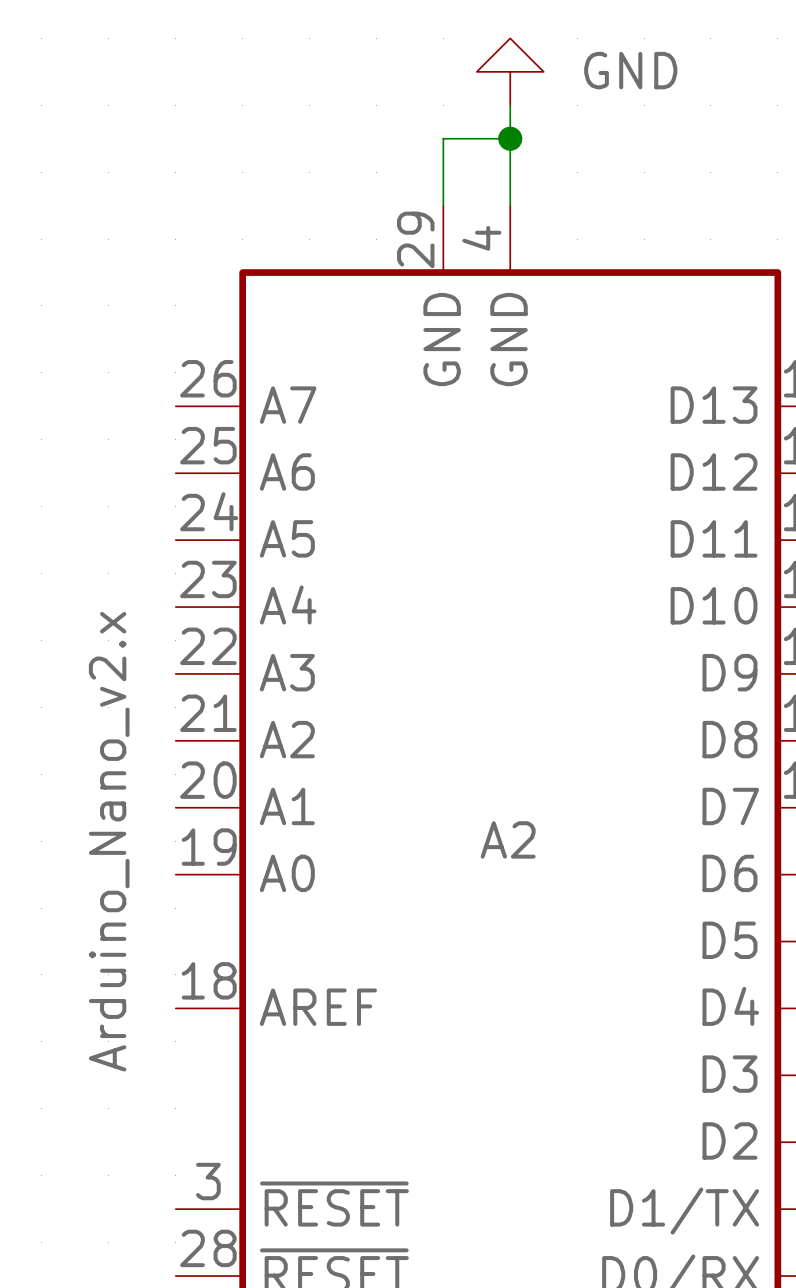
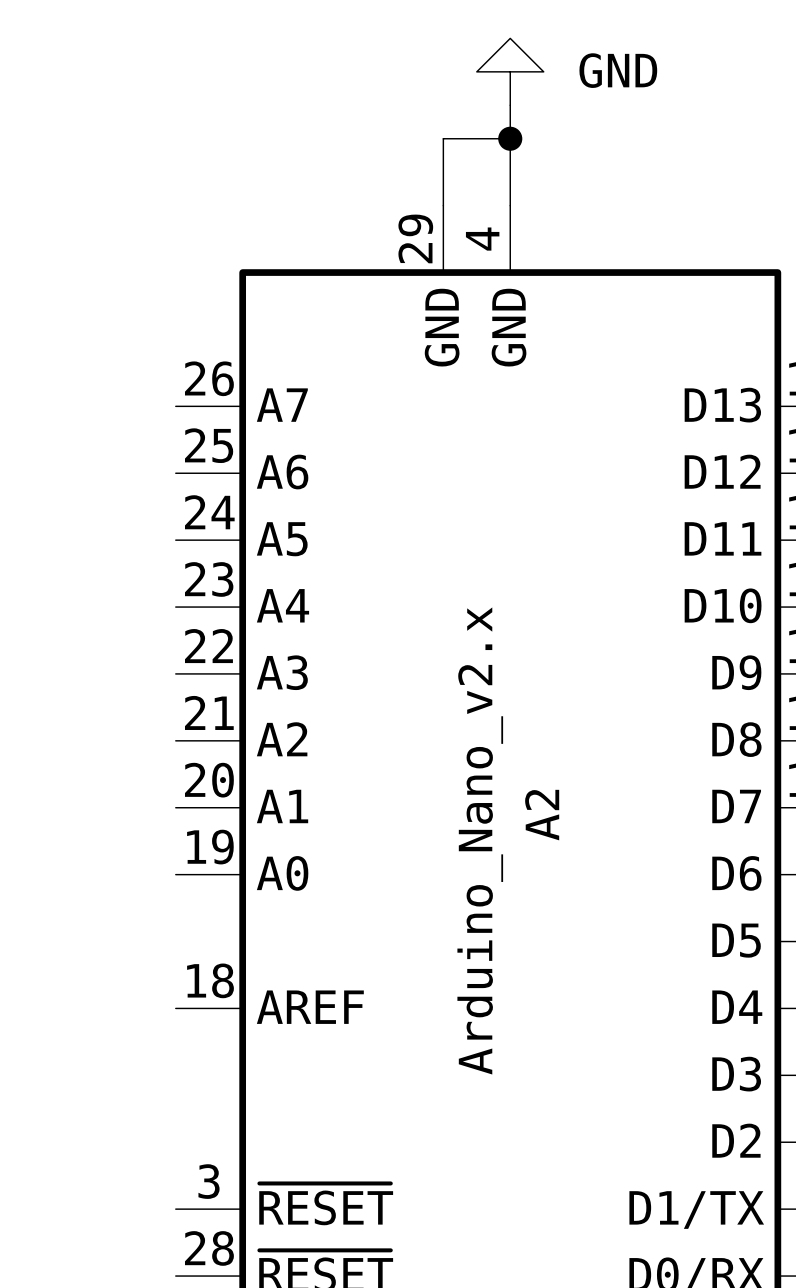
A2 name rotation: 0° (508, 839) -> 90° counterclockwise (542, 815)
A2 value position: Arduino_Nano_v2.x (109, 841) -> Arduino_Nano_v2.x (480, 840)

